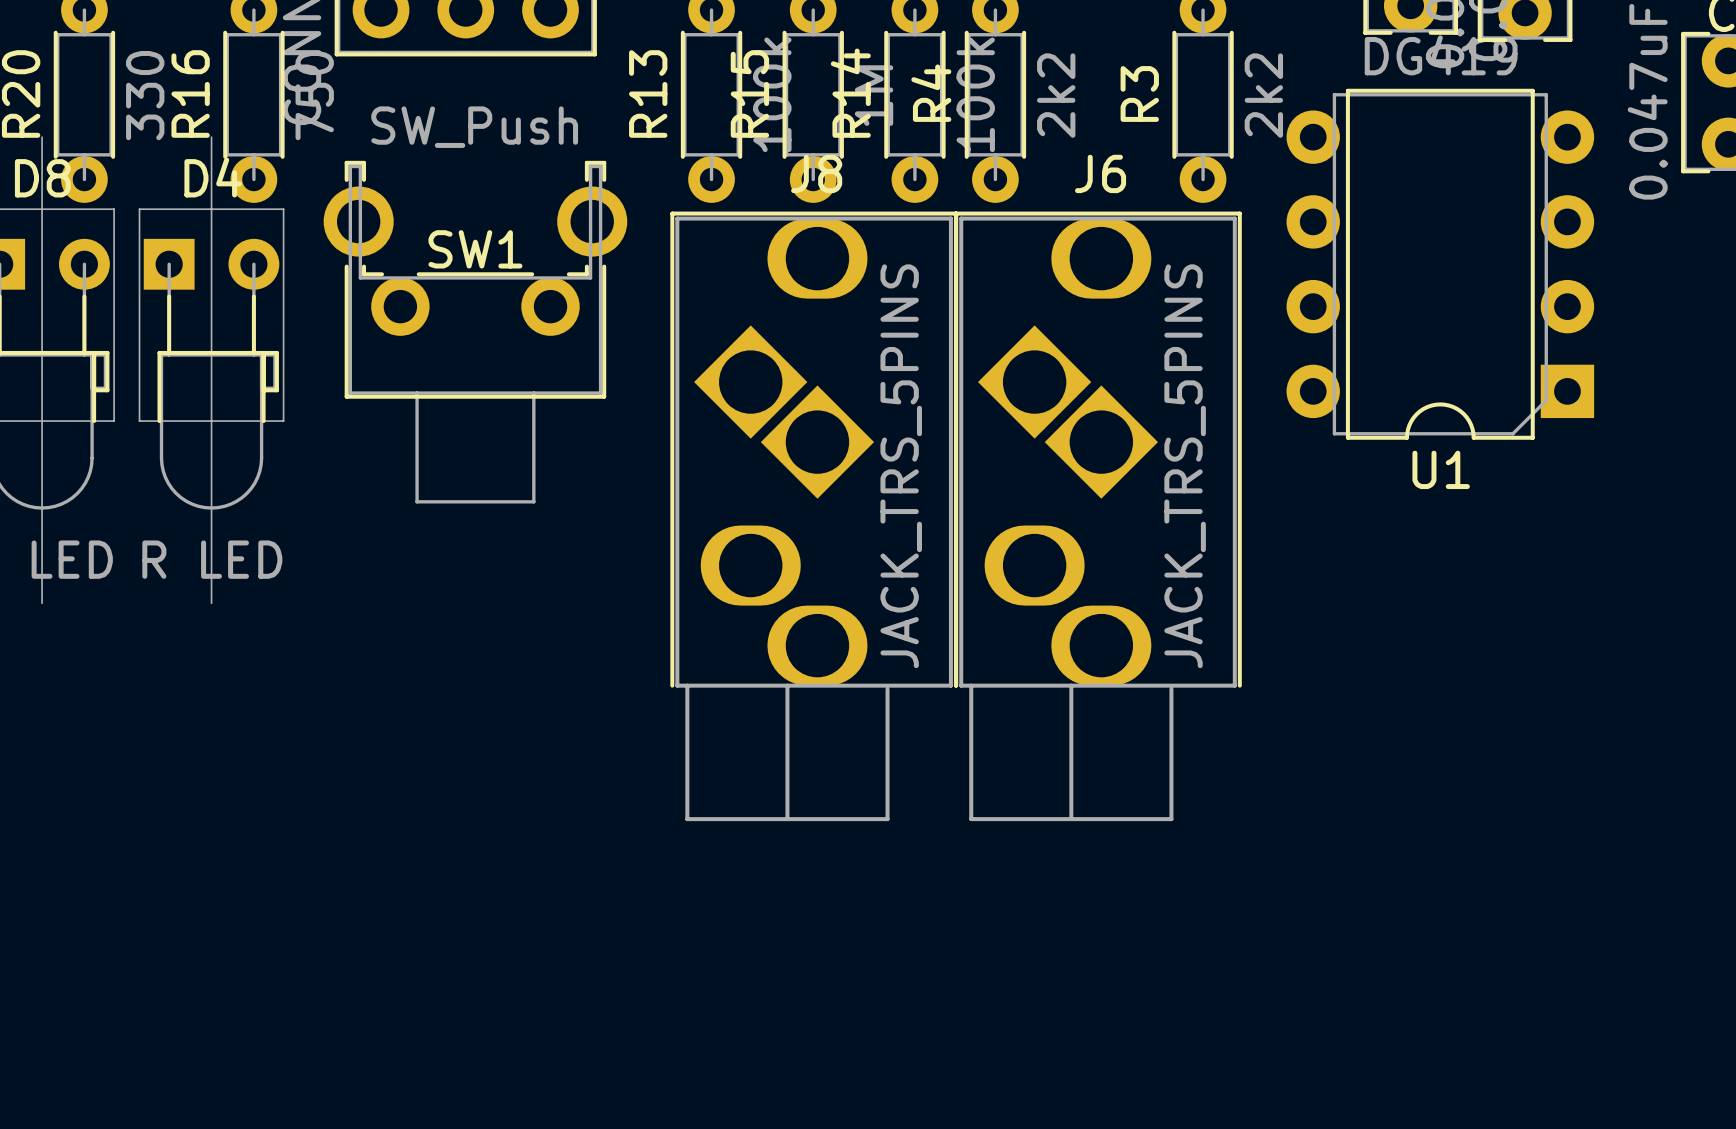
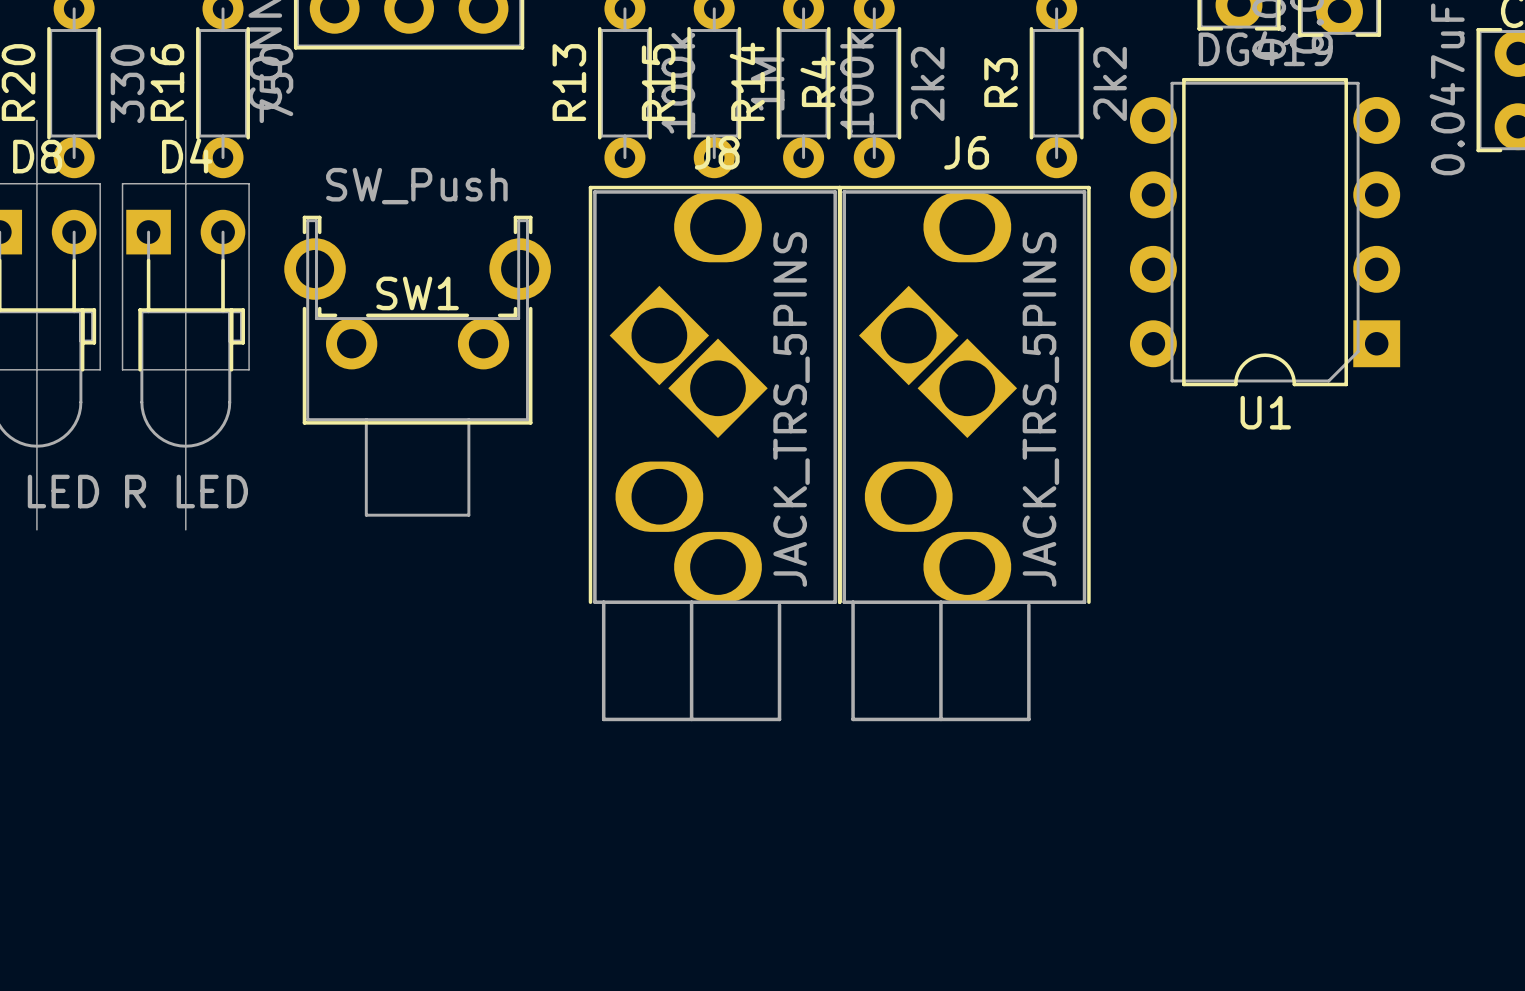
SW1 position: (475, 332) -> (417, 366)

